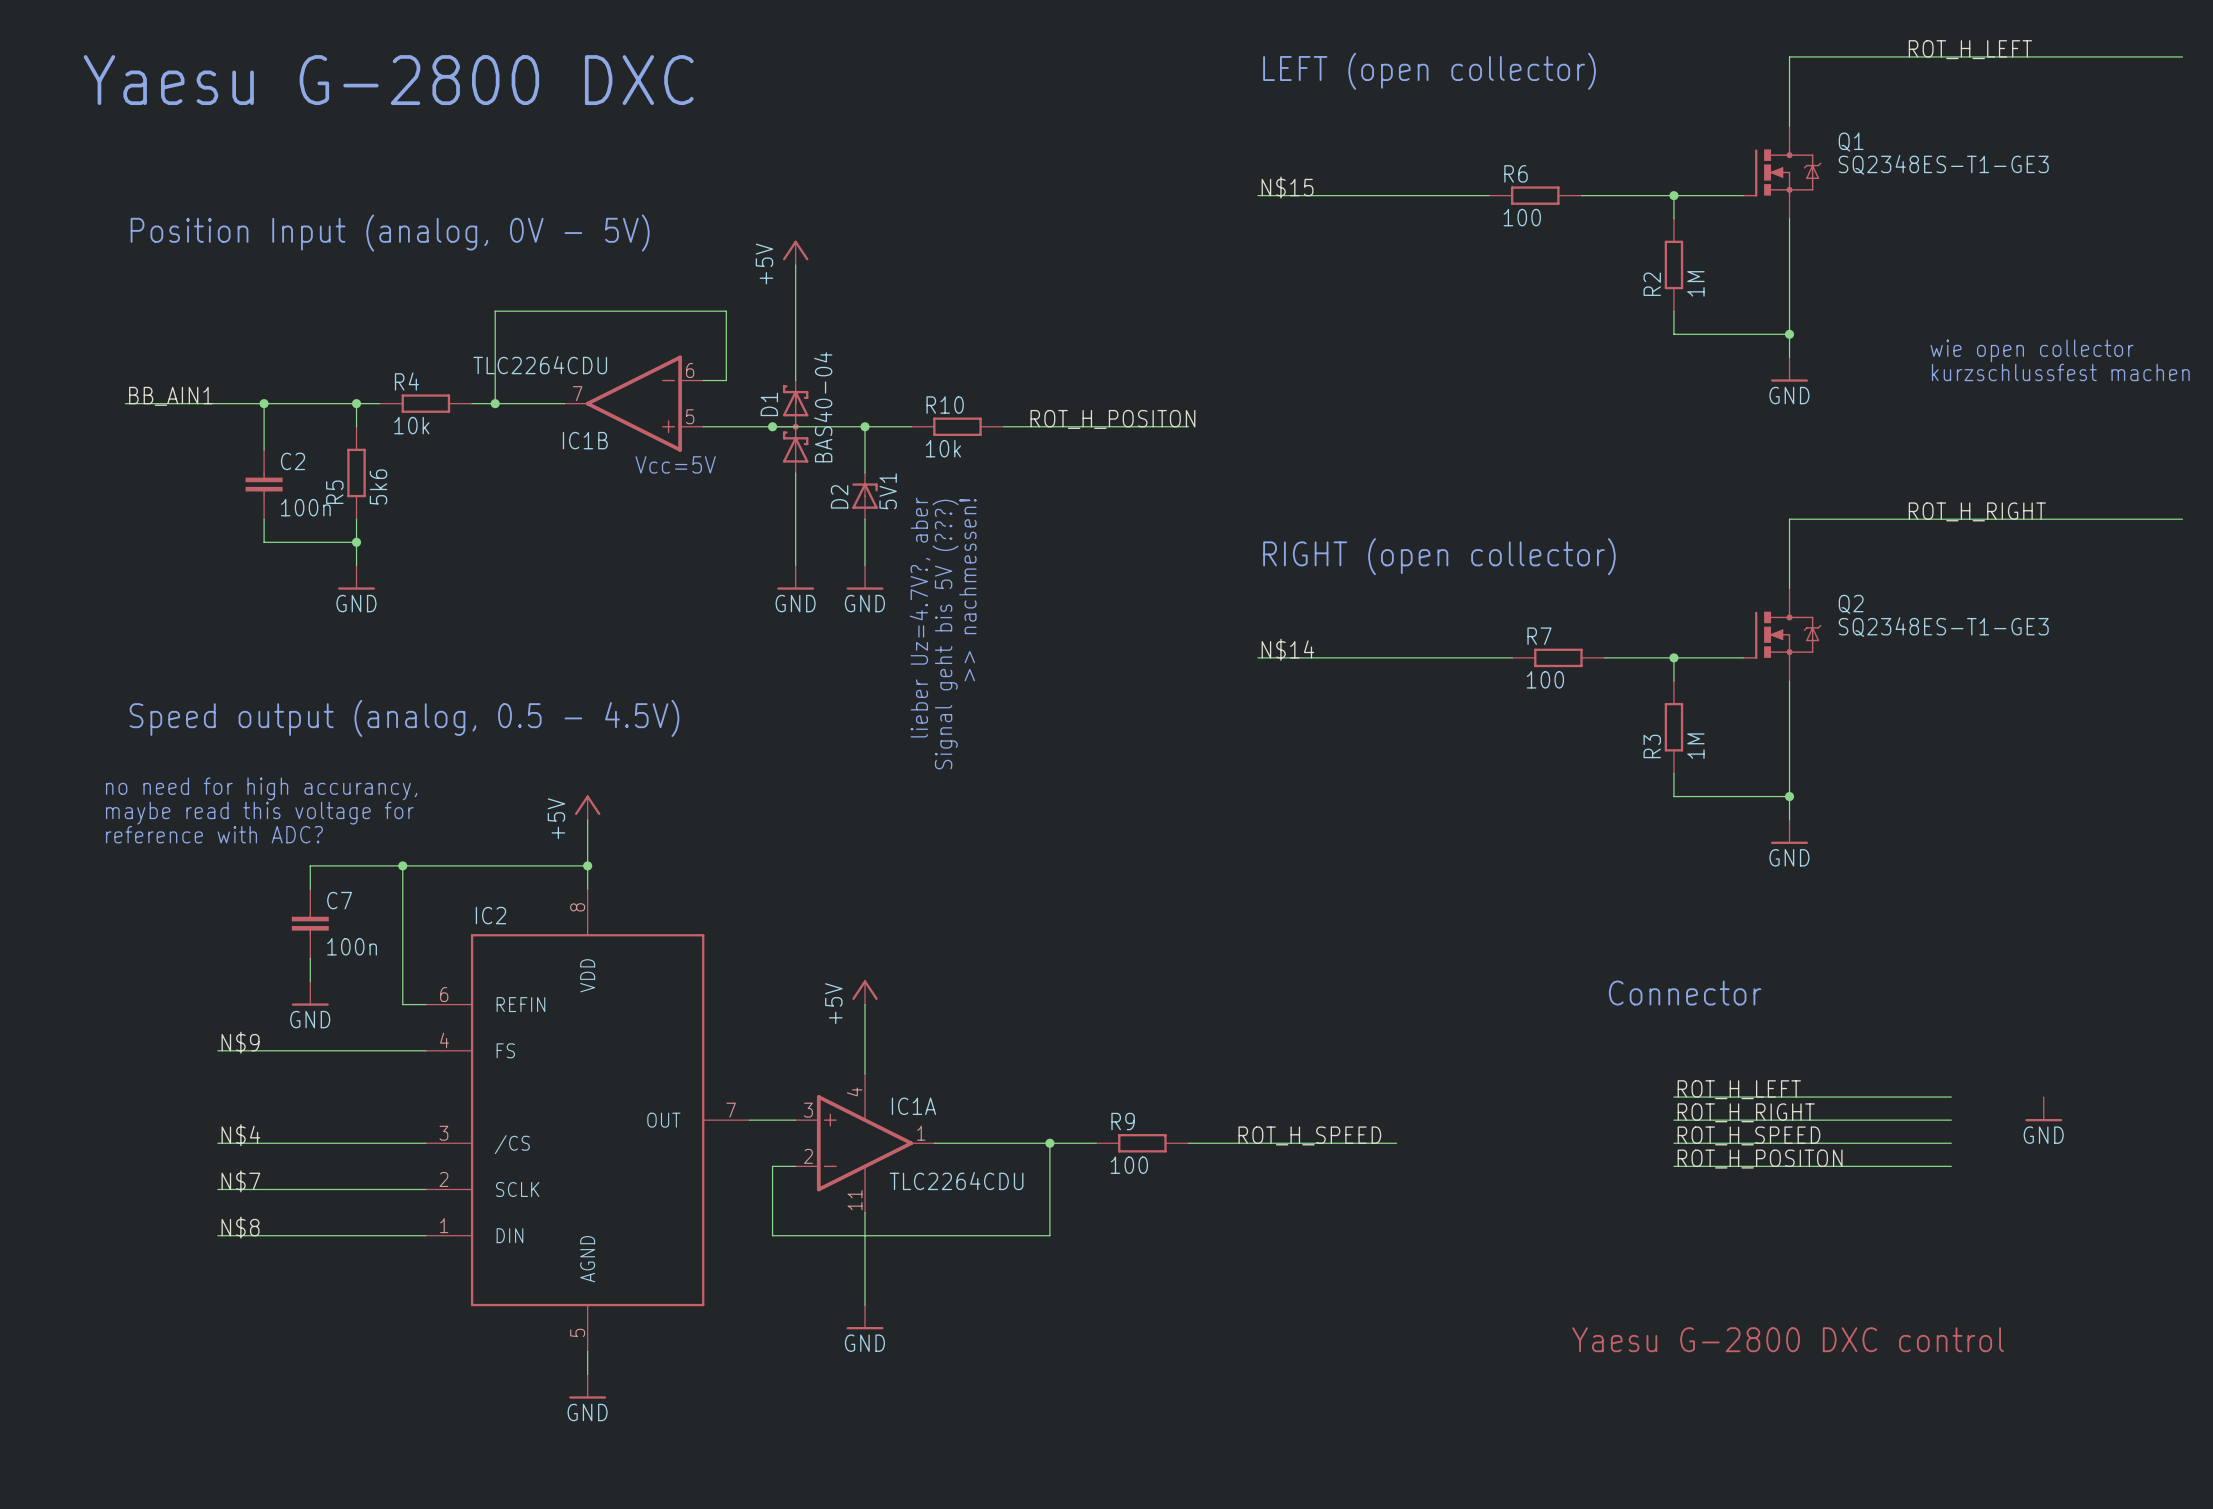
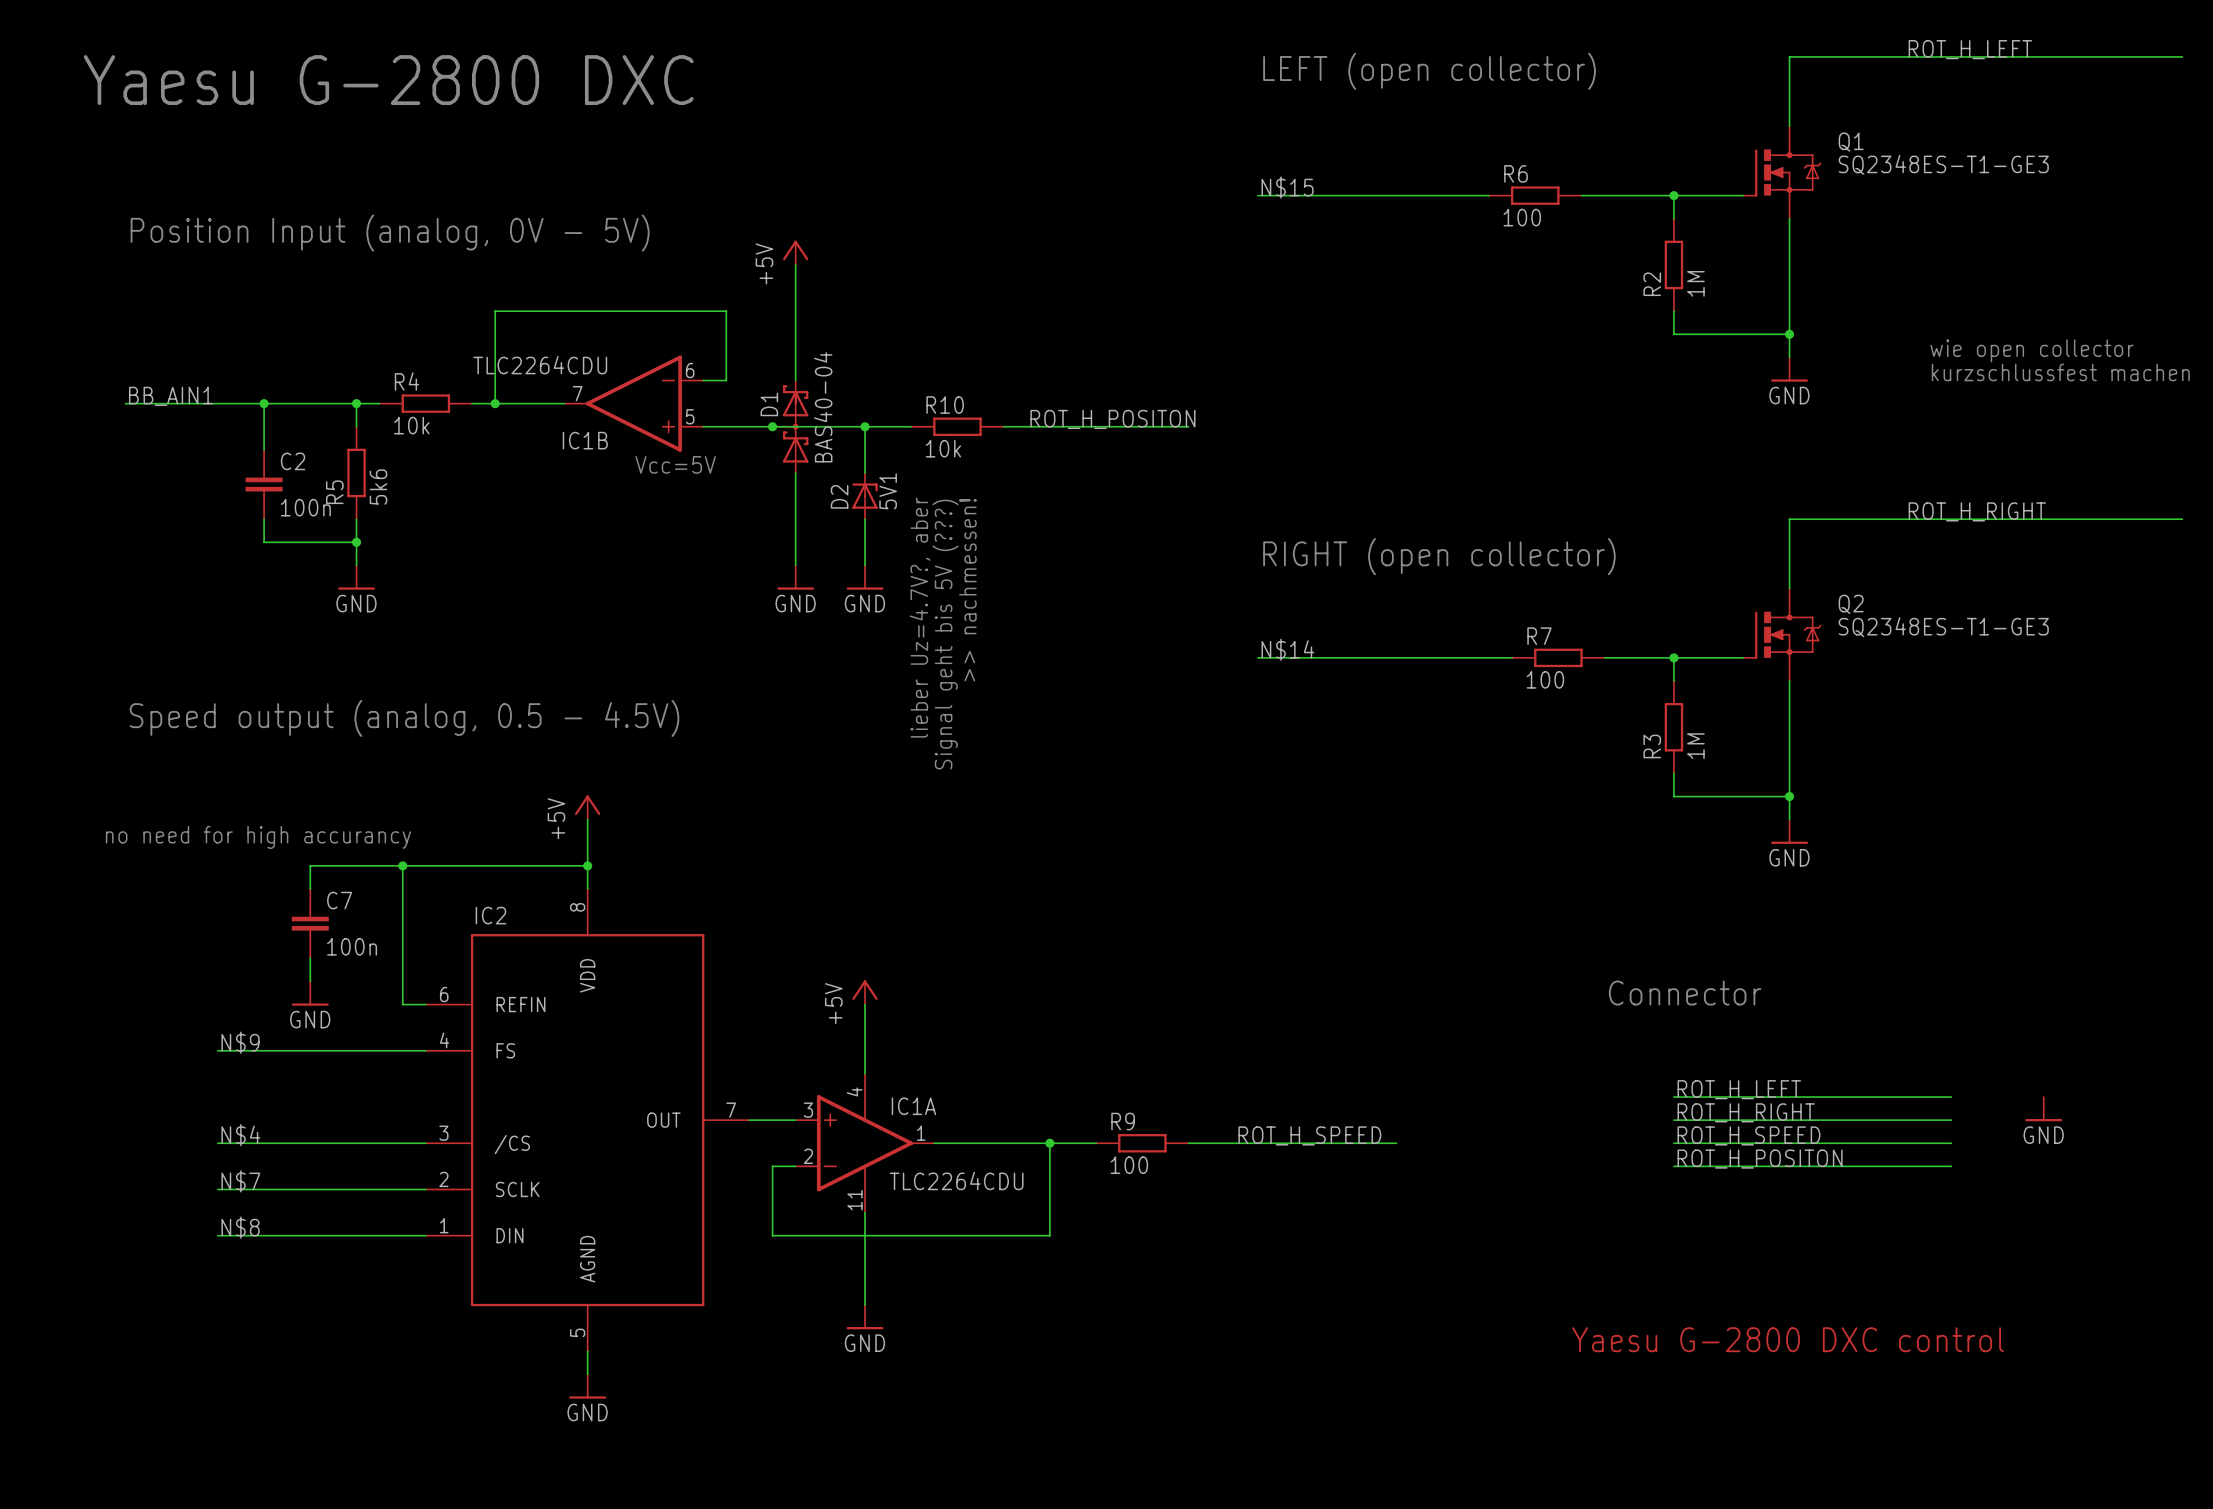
text: no need for high accurancy, (261, 788) -> none
text: maybe read this voltage for (259, 813) -> none
text: reference with ADC? (214, 834) -> no need for high accurancy (258, 837)

